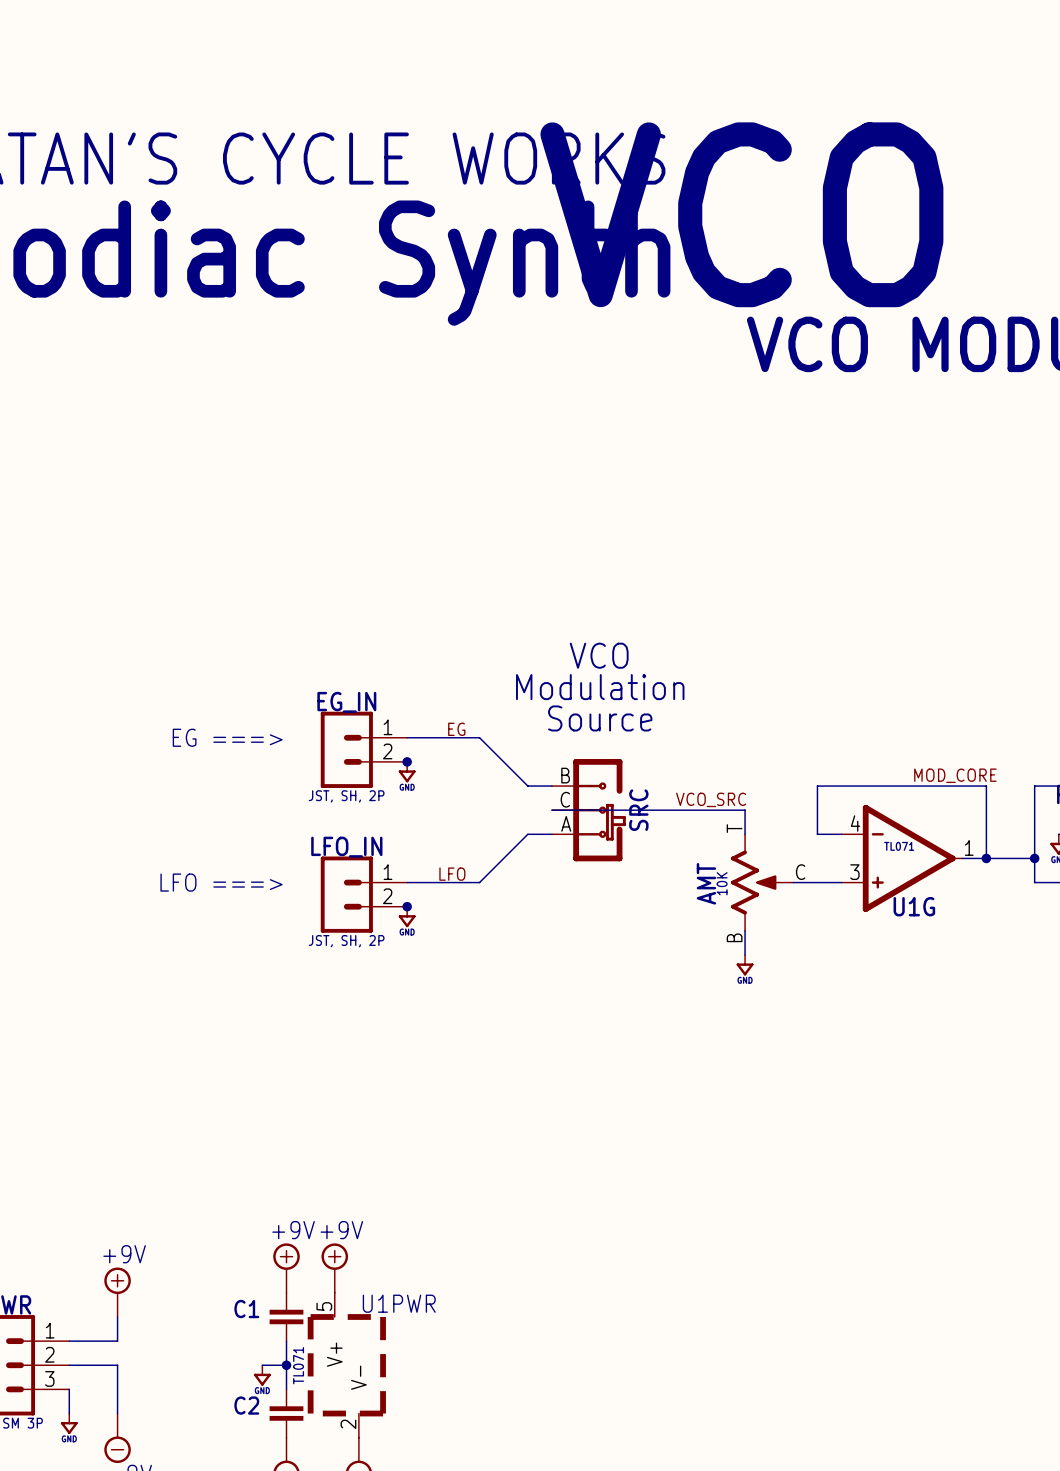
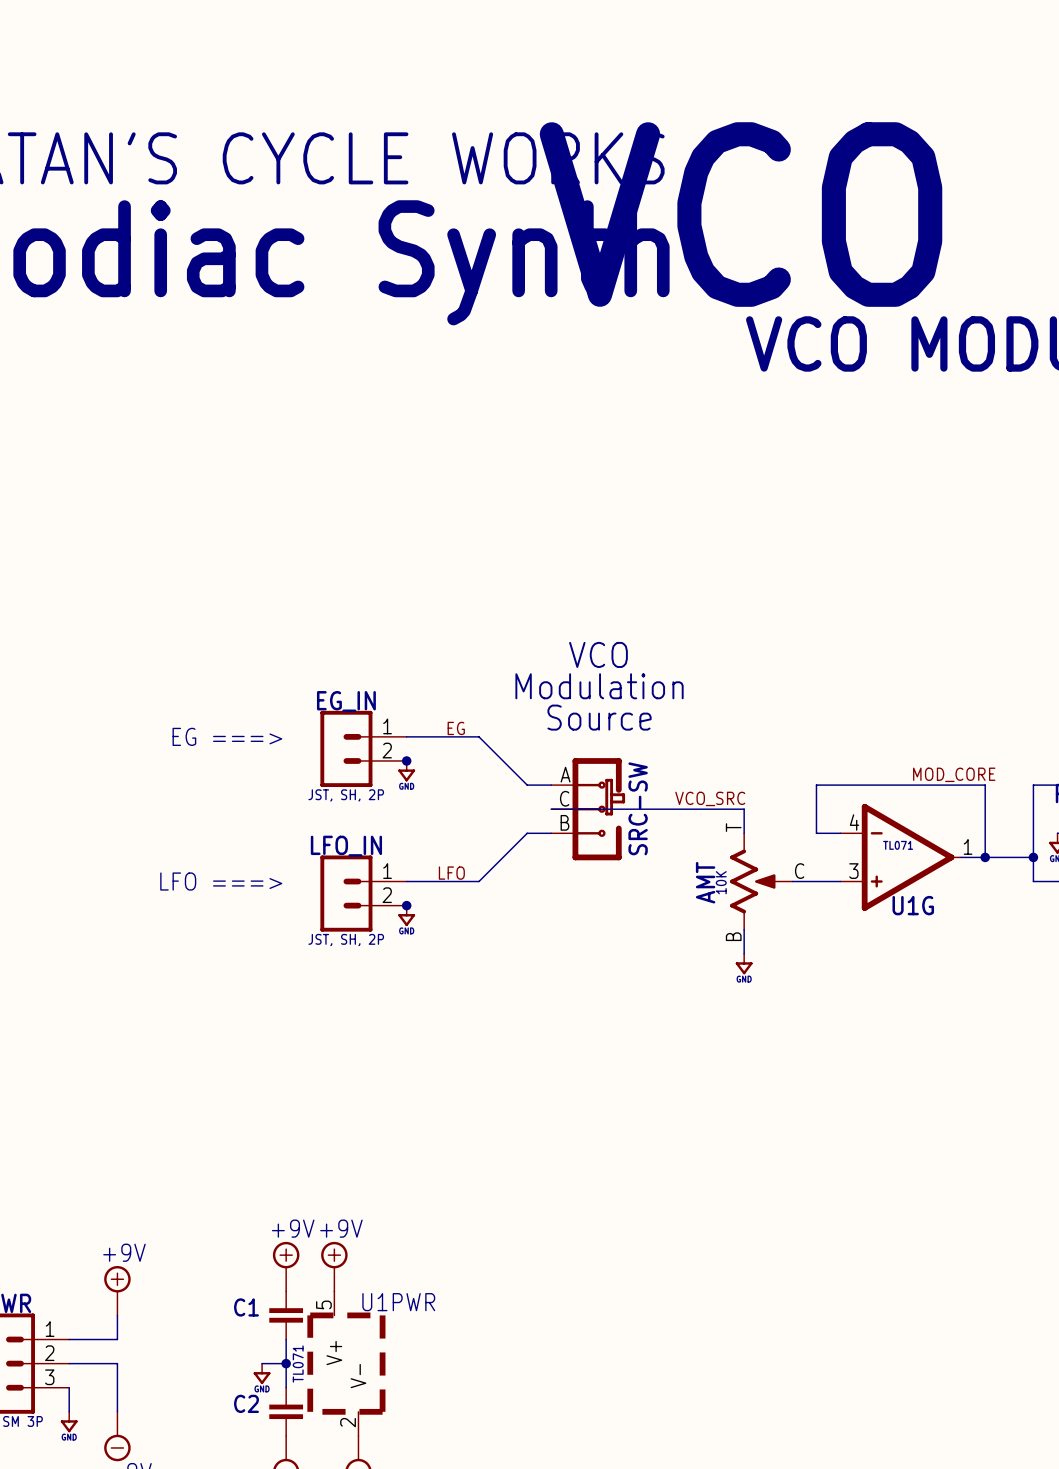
SRC: (588, 810) -> none
SRC-SW: none -> (588, 809)

